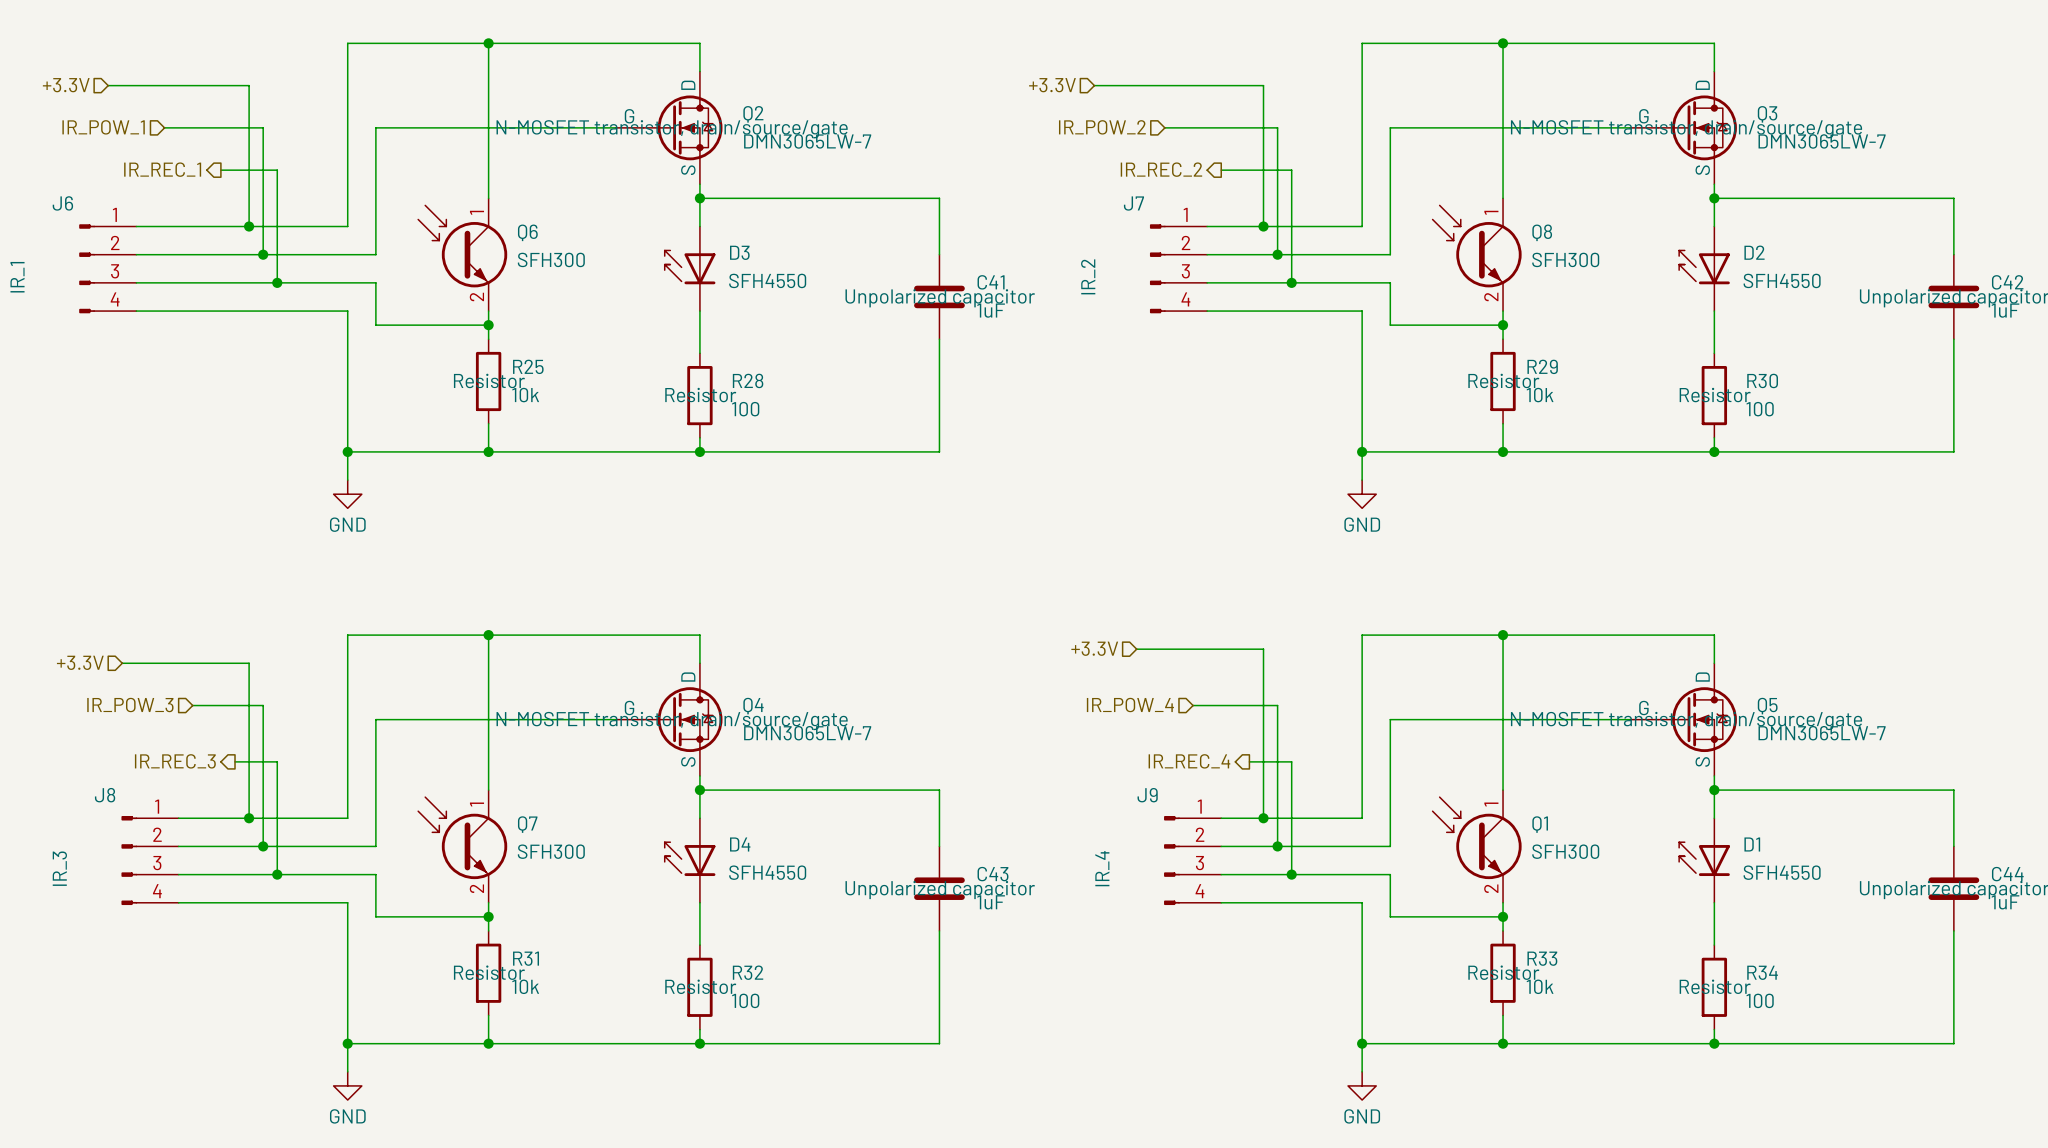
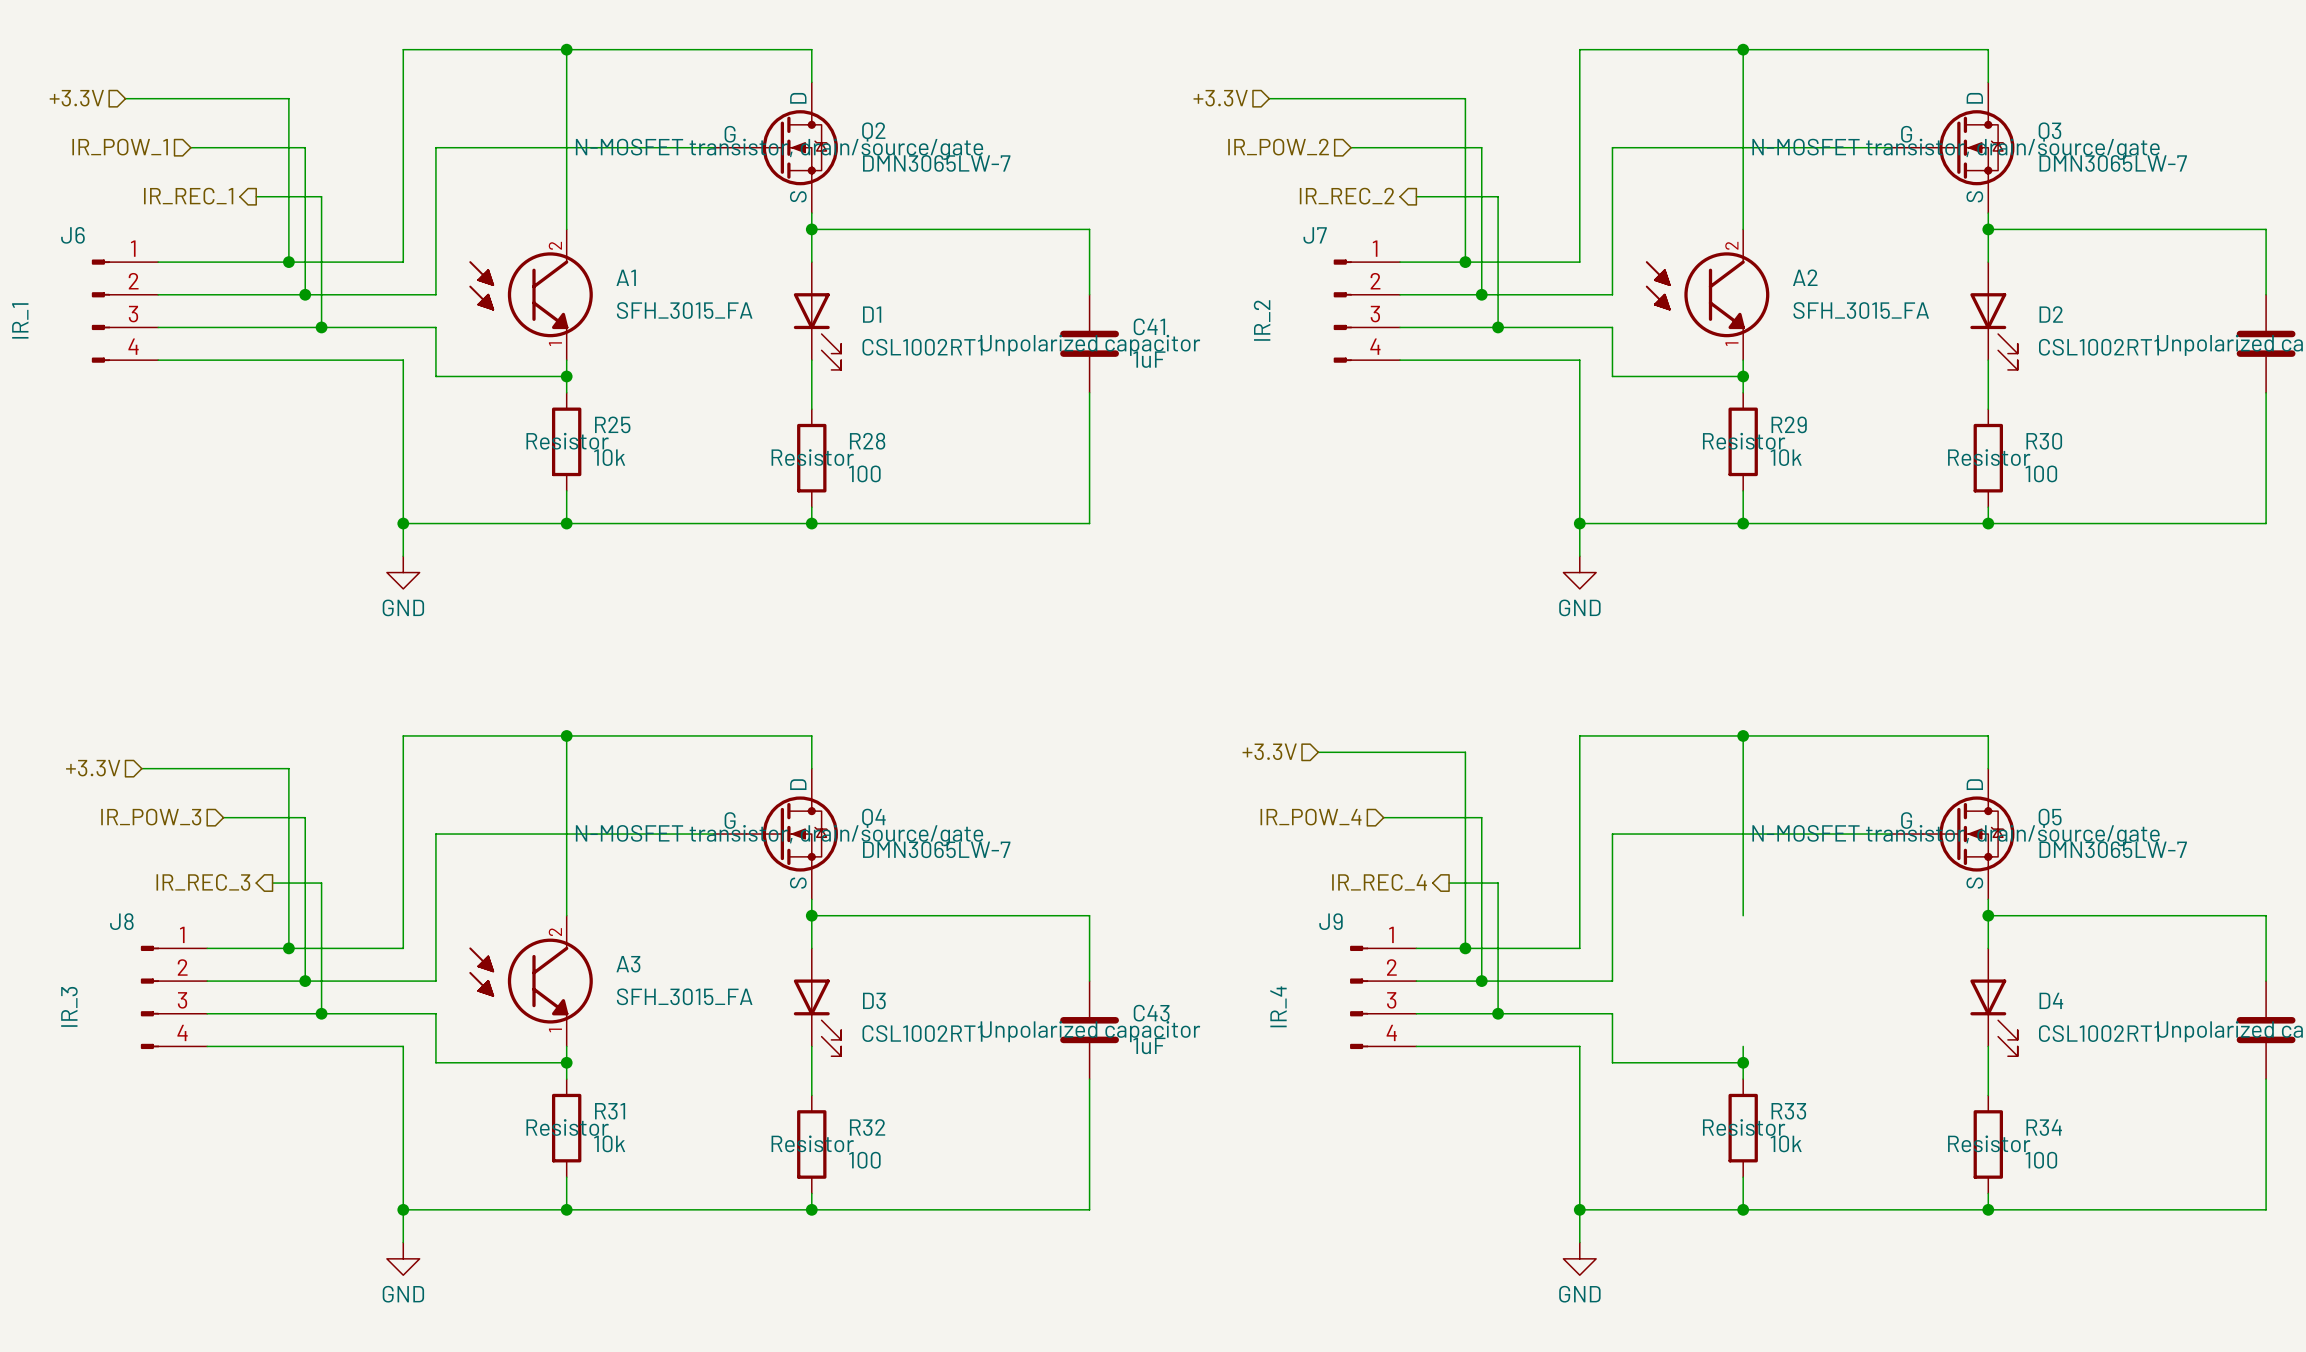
D3 symbol: [664, 226, 716, 312] -> [793, 948, 842, 1057]
D2 symbol: [1679, 226, 1730, 312] -> [1970, 262, 2018, 370]
A1: none -> SFH_3015_FA (531, 294)
Q6: SFH300 (462, 254) -> none
A2: none -> SFH_3015_FA (1707, 294)
Q8: SFH300 (1477, 254) -> none
D3 value: SFH4550 (767, 280) -> CSL1002RT1 (922, 1033)
D2 value: SFH4550 (1782, 280) -> CSL1002RT1 (2099, 347)
D4 symbol: [664, 818, 716, 903] -> [1970, 948, 2018, 1057]
D1 symbol: [1679, 818, 1730, 903] -> [793, 262, 842, 370]
A3: none -> SFH_3015_FA (531, 981)
Q7: SFH300 (462, 846) -> none
Q1: SFH300 (1477, 846) -> none
D4 value: SFH4550 (767, 872) -> CSL1002RT1 (2099, 1033)
D1 value: SFH4550 (1782, 872) -> CSL1002RT1 (922, 347)

